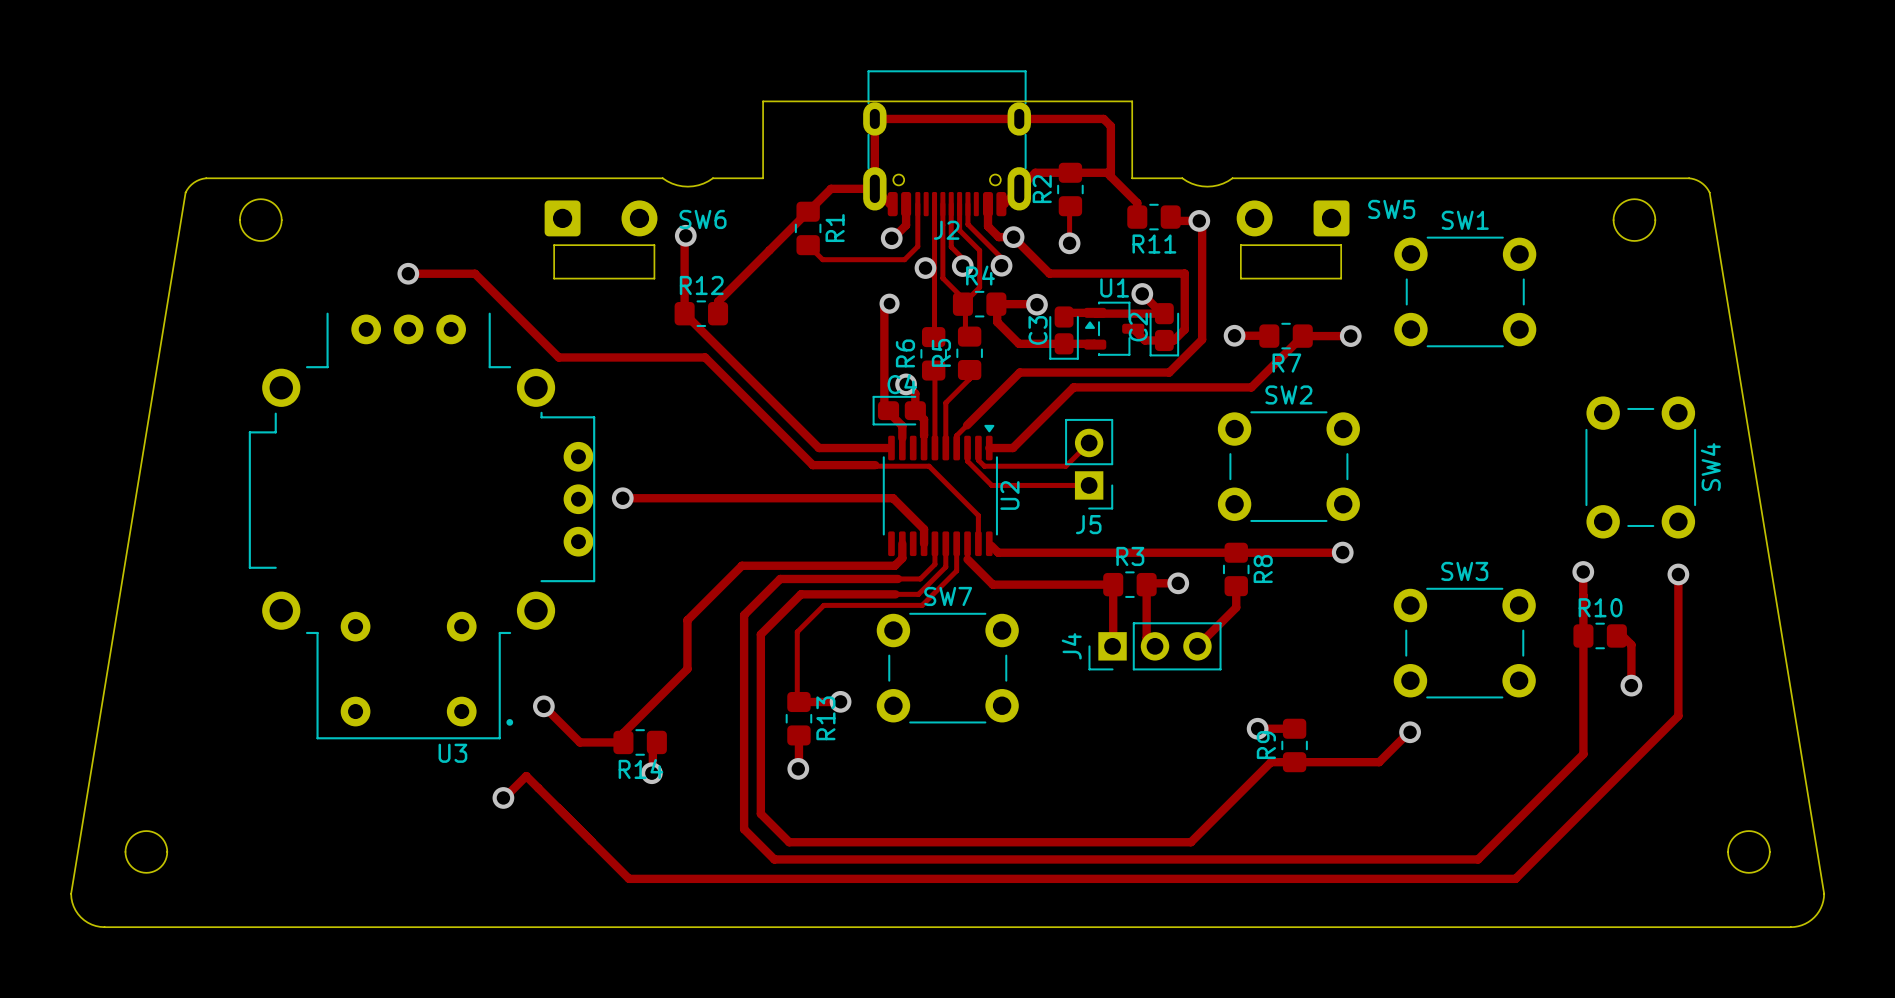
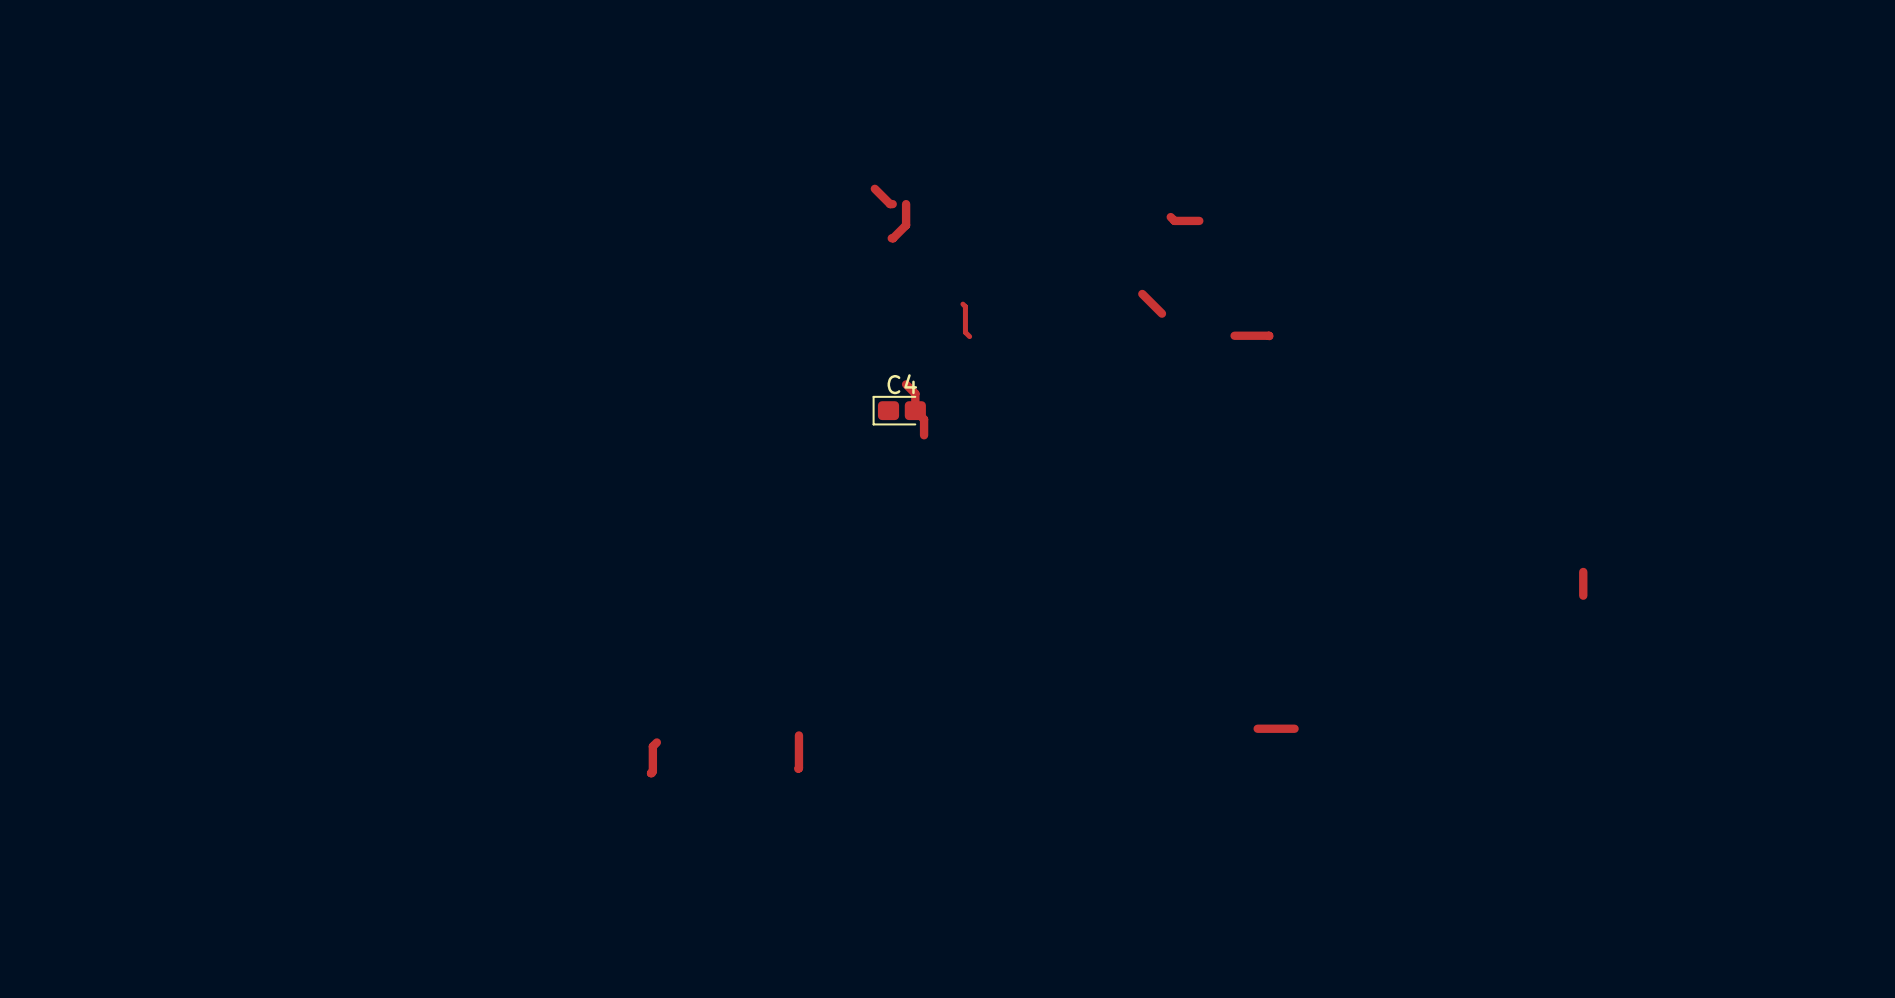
board edge: (763, 101) (763, 178) (712, 178) (703, 183) (687, 186) (672, 183) (662, 178) (206, 178) (196, 181) (189, 187) (185, 192) (71, 893) (73, 906) (84, 920) (91, 924) (104, 927) (1790, 927) (1805, 923) (1816, 914) (1822, 904) (1824, 893) (1709, 192) (1701, 182) (1689, 178) (1232, 178) (1218, 185) (1202, 186) (1182, 178) (1132, 178) (1132, 101) (763, 101) -> none
J2: (947, 143) -> none
track: (1110, 176) (1110, 126) (1103, 118) (874, 118) (874, 188) (831, 188) (718, 301) (718, 313) -> none
R2: (1070, 189) -> none
track: (917, 204) (917, 246) (904, 259) (822, 259) (808, 245) -> none
track: (934, 204) (933, 337) -> none
track: (942, 204) (942, 278) (962, 298) (962, 304) (979, 287) (979, 250) (959, 230) (959, 204) -> none
track: (951, 204) (951, 246) (962, 258) (962, 266) -> none
track: (967, 204) (967, 224) (1001, 258) (1001, 265) -> none
track: (988, 204) (988, 226) (998, 237) (1013, 237) (1049, 273) (1184, 273) (1184, 329) (1173, 340) (1144, 340) (1133, 328) -> none
track: (1001, 204) (1003, 204) (1035, 172) (1107, 172) (1137, 203) (1137, 217) -> none
track: (1070, 206) (1069, 243) -> none
R11: (1154, 217) -> none
SW6: (601, 218) -> none
SW5: (1293, 218) -> none
board edge: (239, 220) (245, 206) (251, 201) (260, 199) (274, 204) (279, 210) (281, 220) (276, 233) (268, 239) (260, 240) (253, 239) (245, 233) (239, 220) -> none
via: (1199, 220) -> none
board edge: (1613, 220) (1615, 212) (1619, 205) (1626, 200) (1634, 199) (1642, 200) (1649, 205) (1653, 212) (1655, 220) (1653, 228) (1649, 234) (1642, 239) (1634, 240) (1626, 239) (1619, 234) (1615, 228) (1613, 220) -> none
track: (1198, 221) (1202, 223) (1202, 339) (1169, 372) (1019, 372) (956, 435) (956, 448) -> none
R1: (808, 228) -> none
track: (685, 235) (684, 313) (818, 448) (887, 448) -> none
via: (685, 235) -> none
via: (1013, 237) -> none
via: (891, 238) -> none
via: (1069, 243) -> none
board edge: (554, 245) (554, 278) (654, 278) (654, 245) (554, 245) -> none
board edge: (1240, 245) (1341, 245) (1341, 278) (1240, 278) (1240, 245) -> none
via: (1001, 265) -> none
via: (962, 266) -> none
via: (925, 268) -> none
track: (408, 273) (475, 273) (558, 357) (705, 357) (812, 465) (929, 466) (978, 515) (978, 543) -> none
via: (408, 273) -> none
SW1: (1465, 291) -> none
via: (1142, 293) -> none
track: (889, 303) (884, 308) (884, 406) (902, 425) (902, 438) -> none
via: (889, 303) -> none
R4: (979, 304) -> none
track: (996, 304) (1036, 304) -> none
track: (996, 304) (997, 322) (1018, 343) (1095, 344) -> none
via: (1036, 304) -> none
R12: (701, 313) -> none
track: (1164, 313) (1068, 312) (1064, 316) -> none
U1: (1114, 328) -> none
C2: (1164, 329) -> none
C3: (1064, 333) -> none
via: (1234, 335) -> none
R7: (1286, 336) -> none
track: (1350, 336) (1302, 336) (1251, 387) (1073, 387) (1012, 448) (989, 448) -> none
via: (1350, 336) -> none
R6: (933, 353) -> none
R5: (969, 353) -> none
track: (933, 370) (934, 448) -> none
track: (969, 370) (969, 379) (945, 402) (945, 448) -> none
via: (906, 384) -> none
track: (1089, 442) (1065, 466) (984, 466) (978, 460) (978, 448) -> none
track: (967, 448) (967, 461) (991, 485) (1089, 485) -> none
J5: (1089, 464) -> none
SW2: (1288, 466) -> none
SW4: (1640, 467) -> none
U2: (940, 490) -> none
via: (622, 498) -> none
track: (623, 499) (893, 498) (924, 529) (924, 543) (924, 531) -> none
U3: (422, 525) -> none
track: (902, 543) (902, 558) (894, 565) (741, 565) (687, 620) (687, 669) (623, 733) (623, 742) -> none
track: (934, 543) (934, 564) (920, 578) (780, 578) (744, 615) (744, 829) (774, 859) (1478, 859) (1583, 754) (1583, 595) -> none
track: (945, 543) (945, 567) (918, 594) (800, 594) (760, 634) (760, 813) (789, 842) (1190, 842) (1271, 762) (1379, 762) (1410, 732) -> none
track: (956, 543) (956, 570) (922, 605) (823, 605) (797, 631) (797, 700) (798, 702) (834, 702) -> none
track: (967, 543) (967, 559) (992, 584) (1113, 584) (1113, 645) (1112, 646) (1112, 639) (1113, 638) -> none
track: (989, 543) (998, 552) (1342, 552) -> none
via: (1342, 552) -> none
R8: (1236, 569) -> none
via: (1583, 571) -> none
track: (1678, 574) (1678, 716) (1515, 878) (629, 878) (526, 776) (503, 797) -> none
via: (1678, 574) -> none
track: (1178, 583) (1146, 584) (1146, 637) (1155, 646) -> none
via: (1178, 583) -> none
R3: (1129, 584) -> none
track: (1236, 586) (1236, 607) (1197, 646) -> none
R10: (1600, 635) -> none
track: (1616, 635) (1622, 635) (1631, 644) (1631, 685) -> none
SW3: (1464, 643) -> none
J4: (1155, 646) -> none
SW7: (947, 668) -> none
via: (1631, 685) -> none
via: (840, 701) -> none
track: (543, 706) (579, 742) (623, 742) -> none
via: (543, 706) -> none
R13: (798, 718) -> none
via: (1257, 728) -> none
via: (1410, 732) -> none
R14: (640, 742) -> none
R9: (1294, 745) -> none
via: (798, 768) -> none
via: (651, 773) -> none
via: (503, 797) -> none
board edge: (125, 851) (127, 843) (131, 837) (138, 832) (146, 831) (154, 832) (161, 837) (165, 843) (167, 851) (165, 859) (161, 866) (154, 871) (146, 872) (138, 871) (131, 866) (127, 859) (125, 851) -> none
board edge: (1728, 851) (1729, 843) (1734, 837) (1740, 832) (1748, 831) (1756, 832) (1763, 837) (1768, 843) (1769, 851) (1768, 859) (1763, 866) (1756, 871) (1748, 872) (1740, 871) (1734, 866) (1729, 859) (1728, 851) -> none

